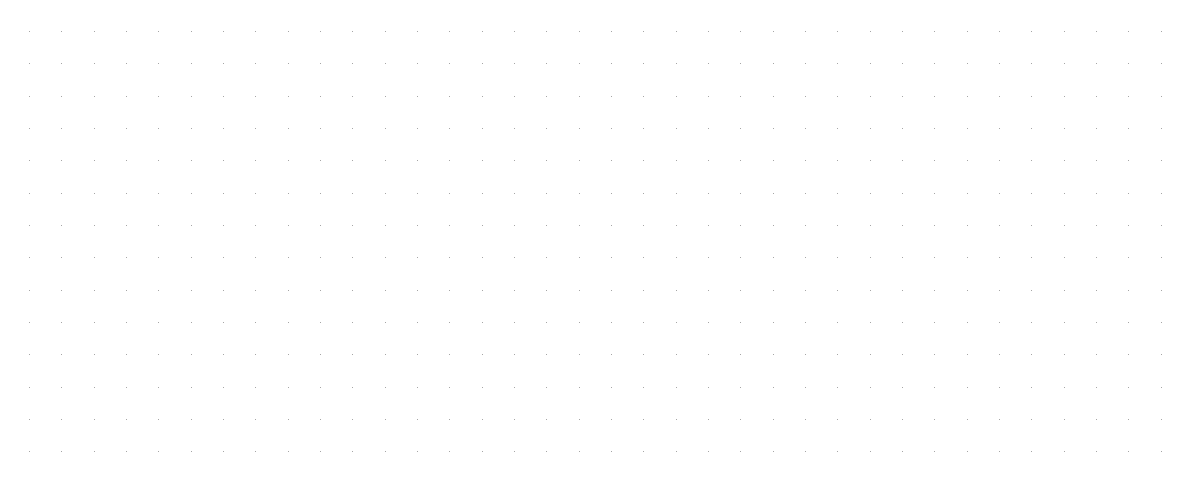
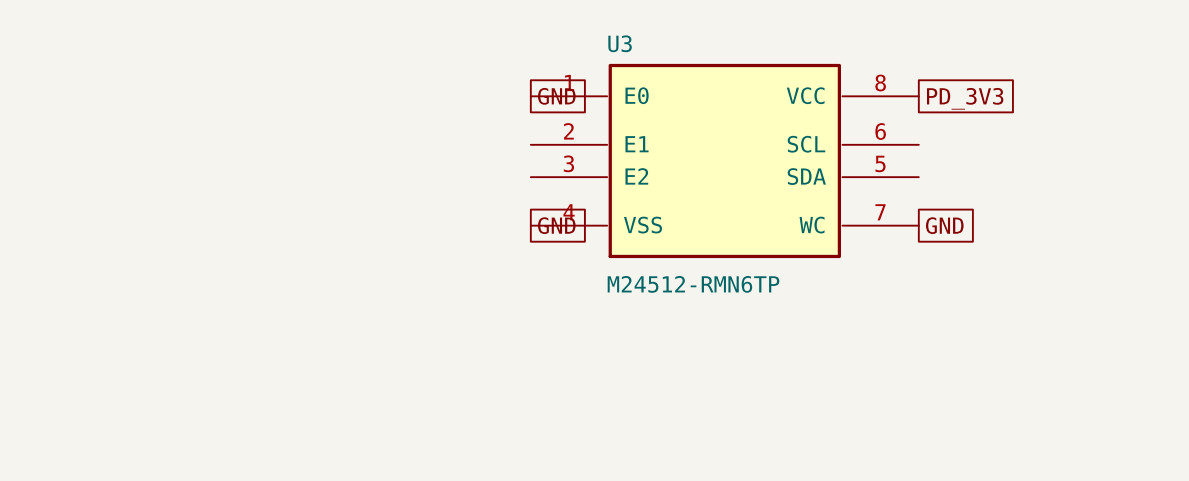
global label: none -> GND (556, 96)
global label: none -> PD_3V3 (965, 98)
U3: none -> M24512-RMN6TP (724, 160)
global label: none -> GND (556, 225)
global label: none -> GND (944, 225)

